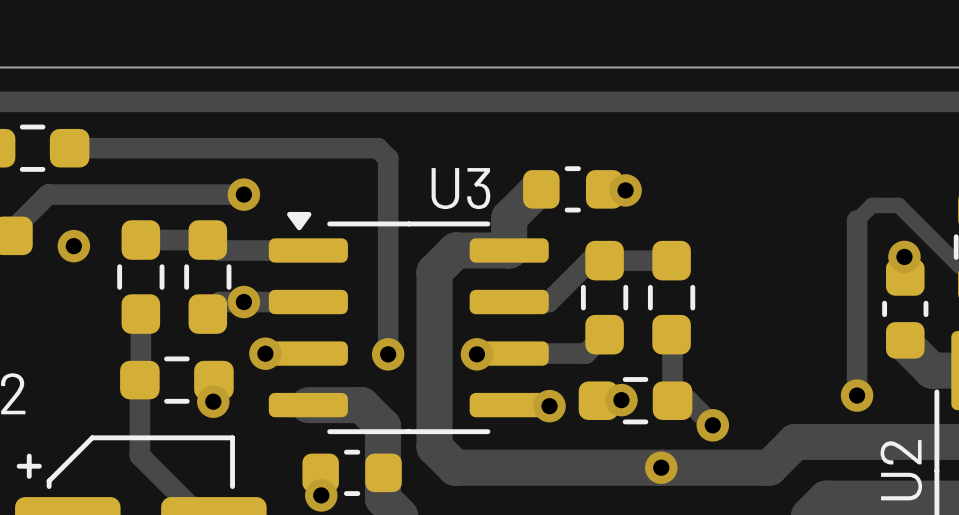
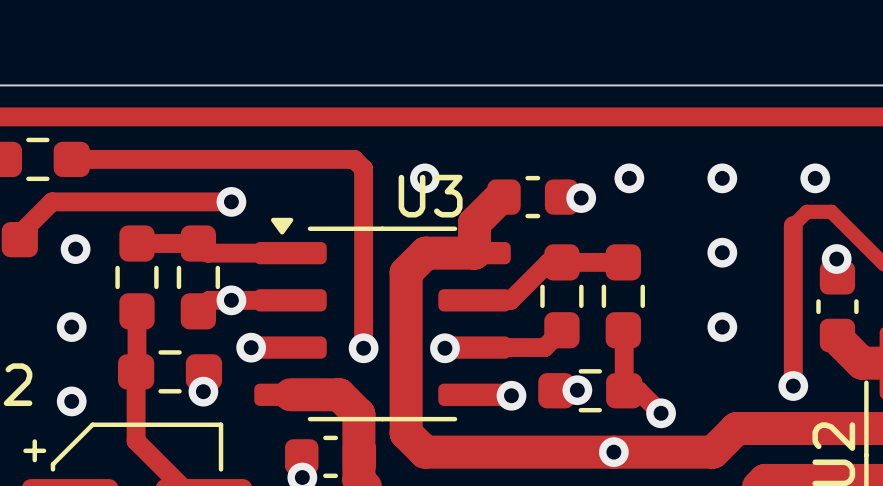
via: none -> (424, 178)
via: none -> (629, 178)
via: none -> (722, 178)
via: none -> (815, 178)
via: none -> (722, 252)
via: none -> (71, 327)
via: none -> (722, 327)
via: none -> (71, 401)

